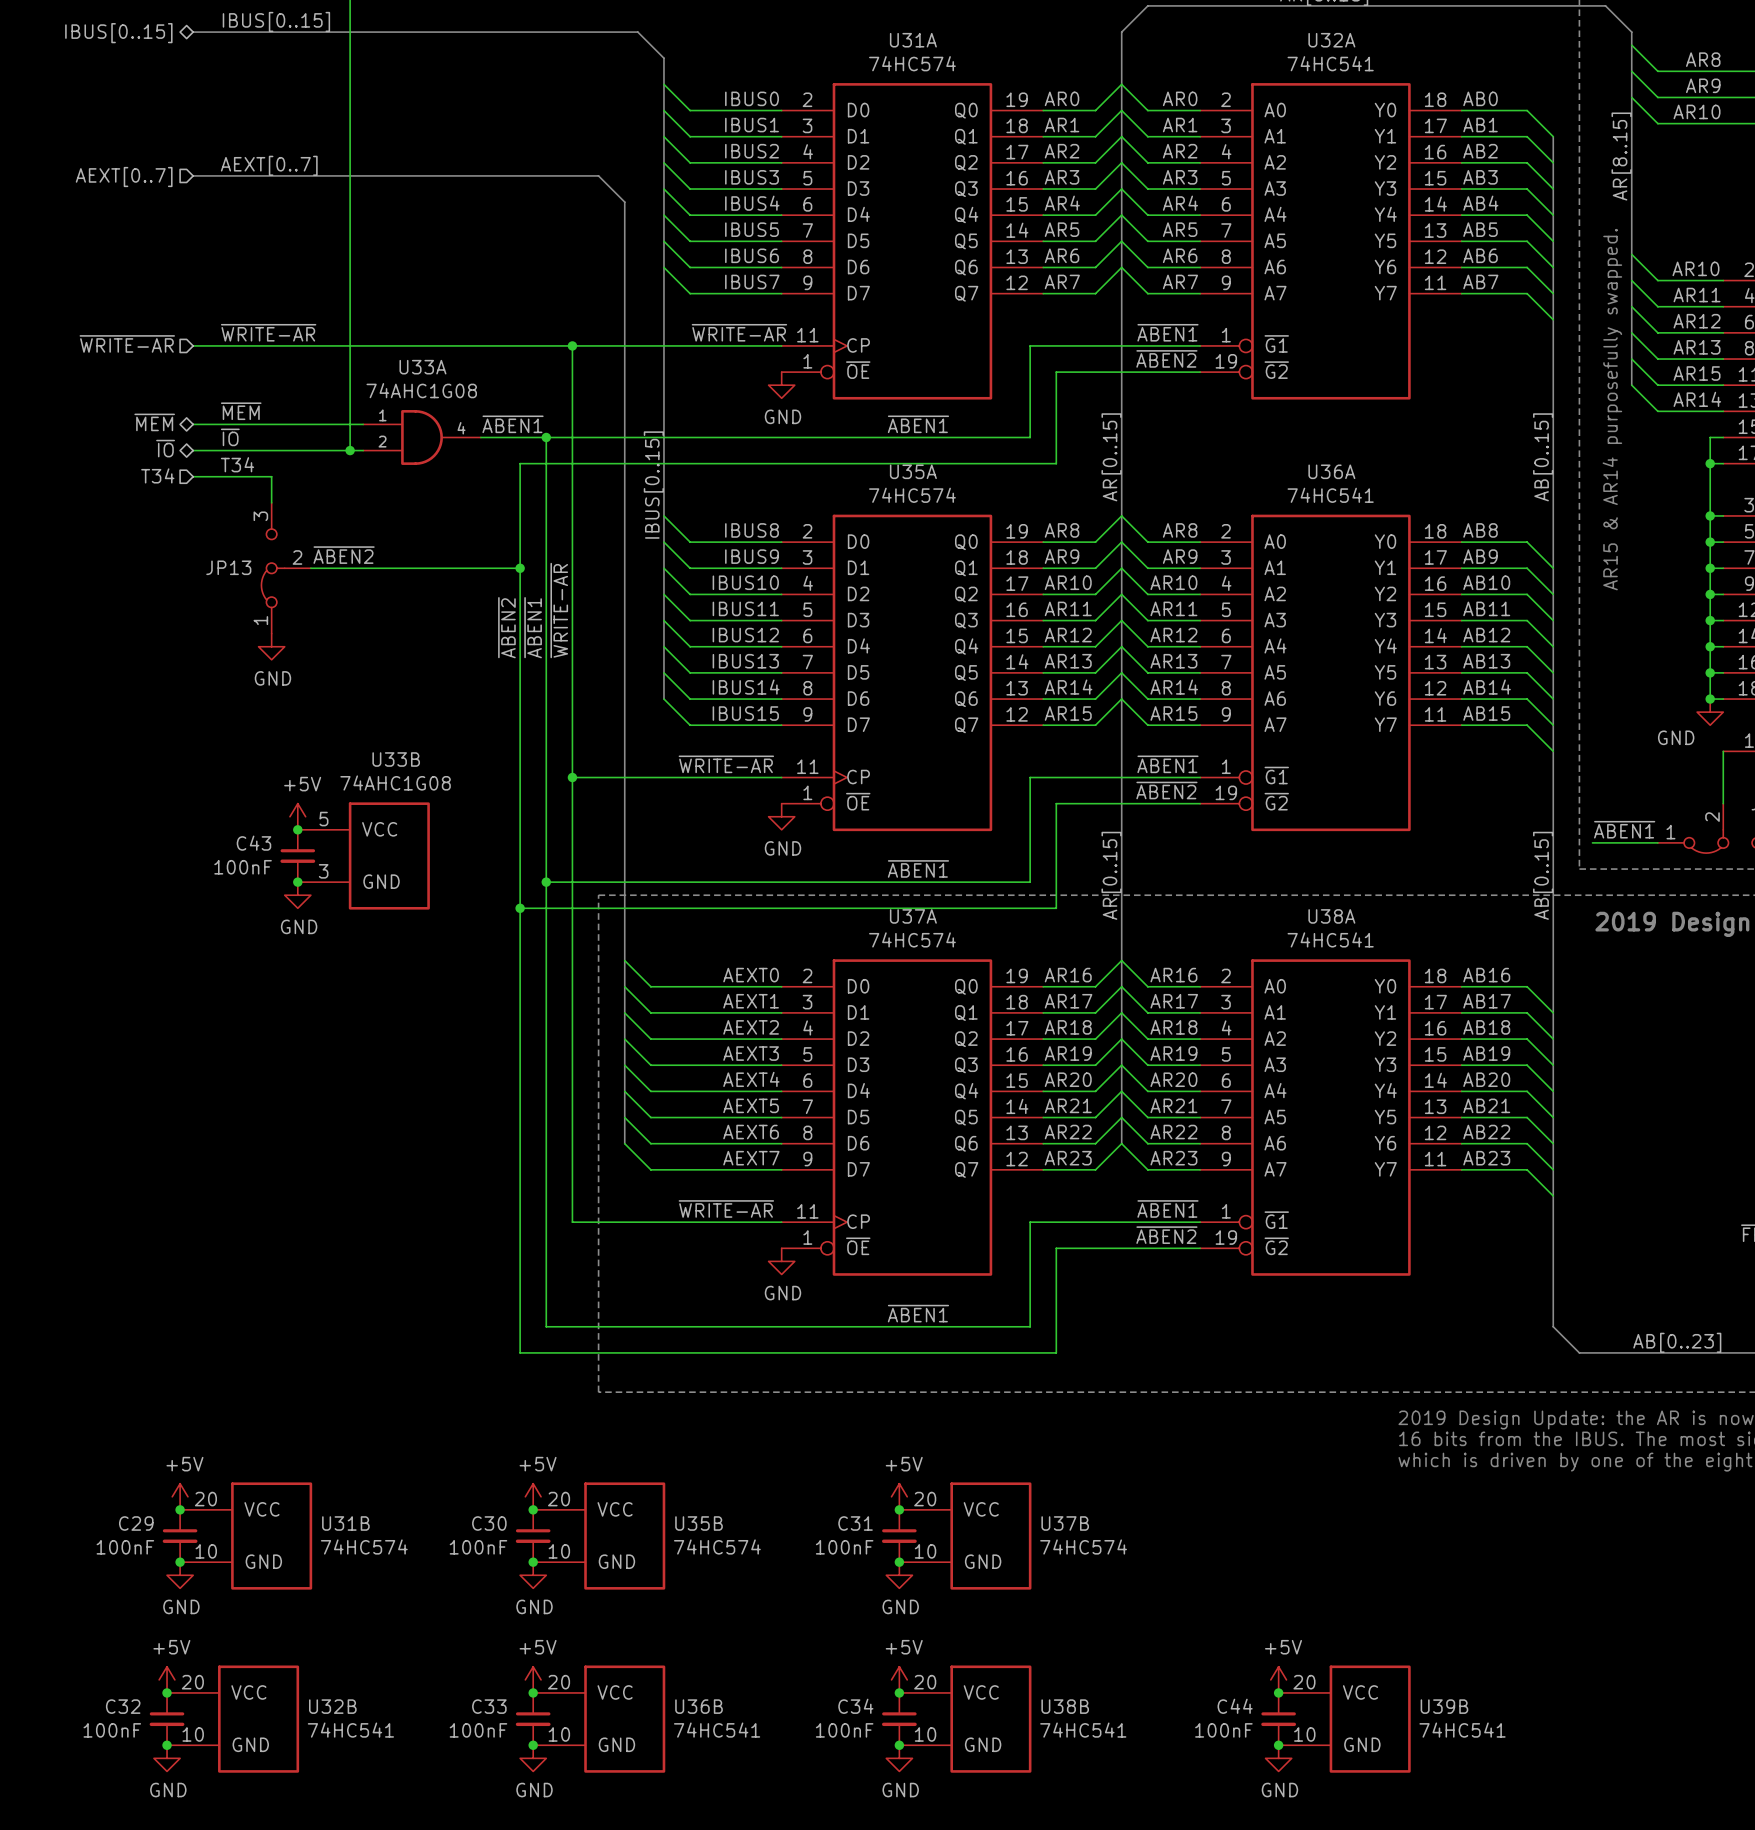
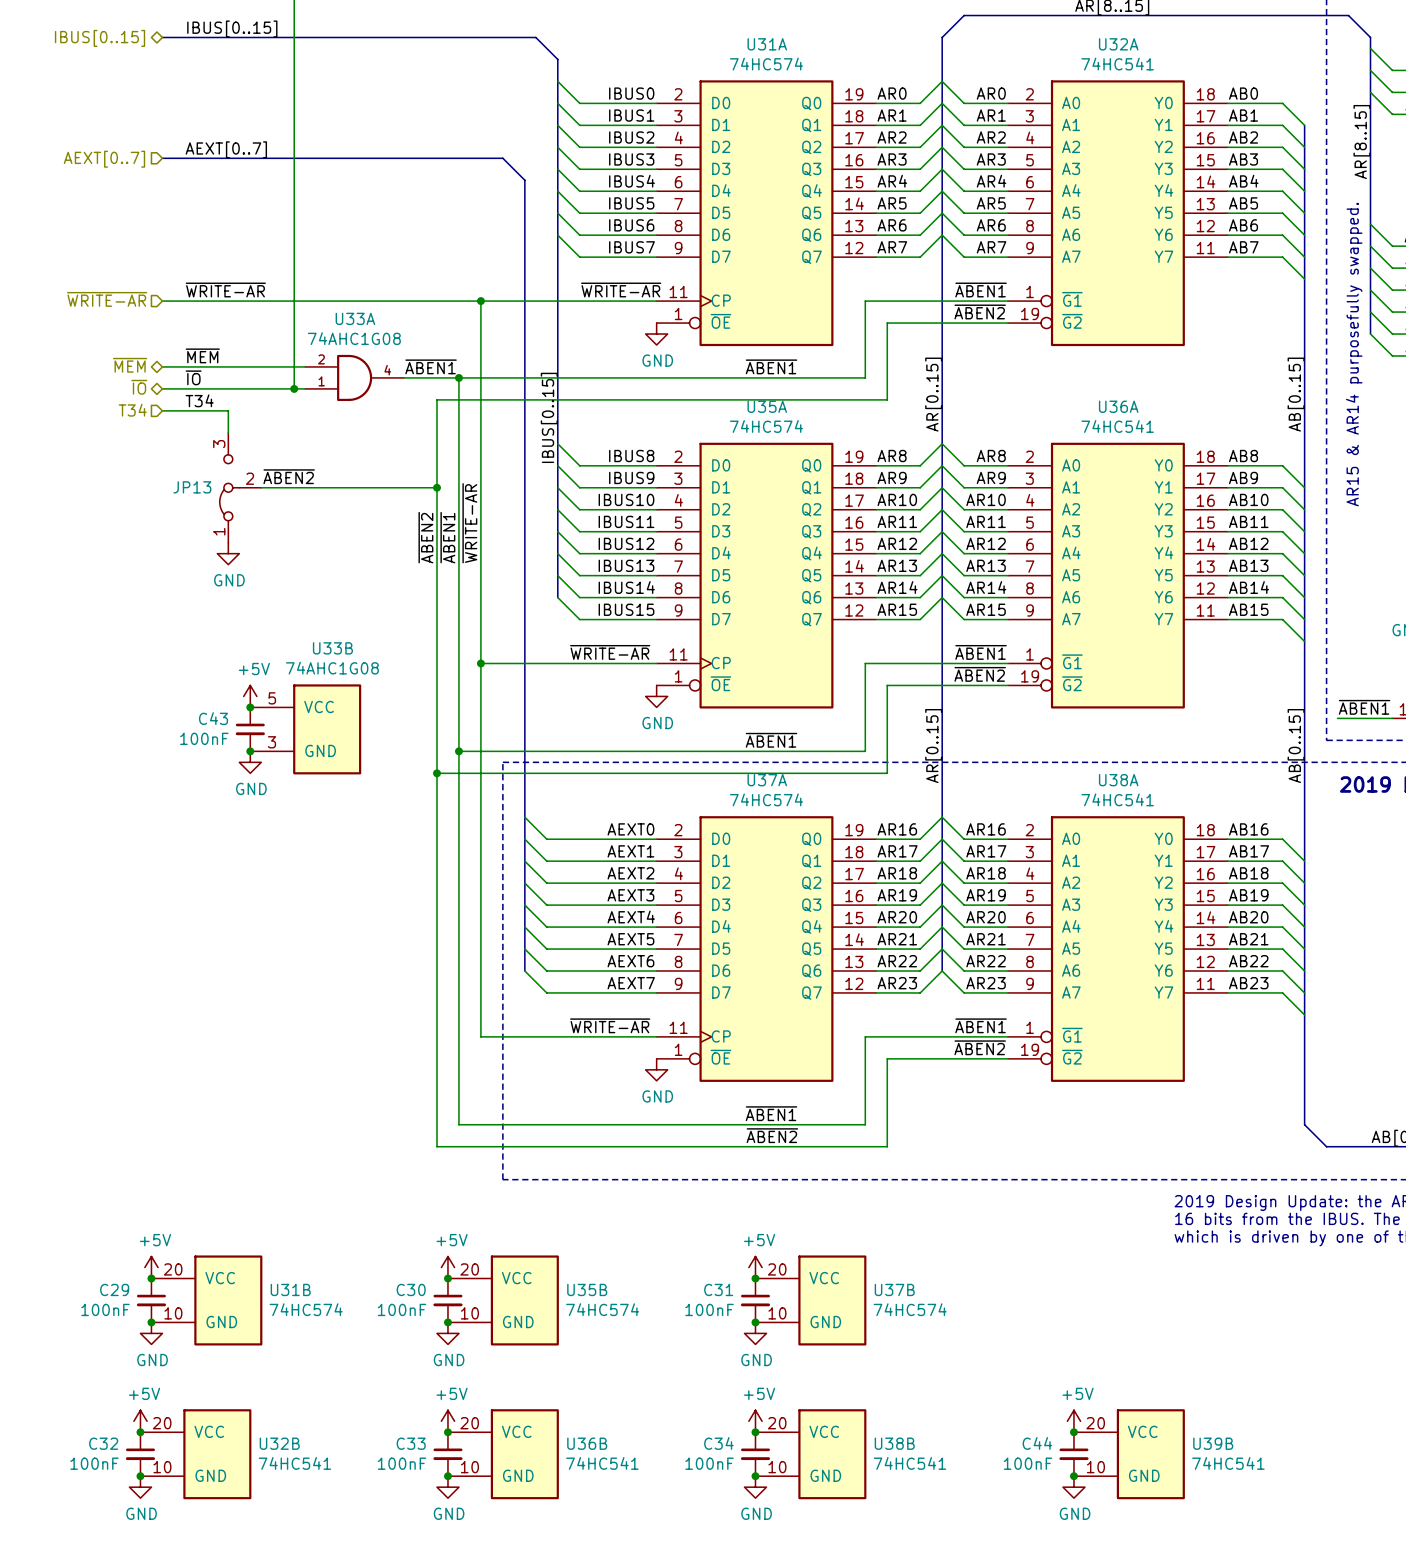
U33A flip: as is (422, 437) -> up-down (354, 377)
label: none -> ~{ABEN2} (772, 1135)

